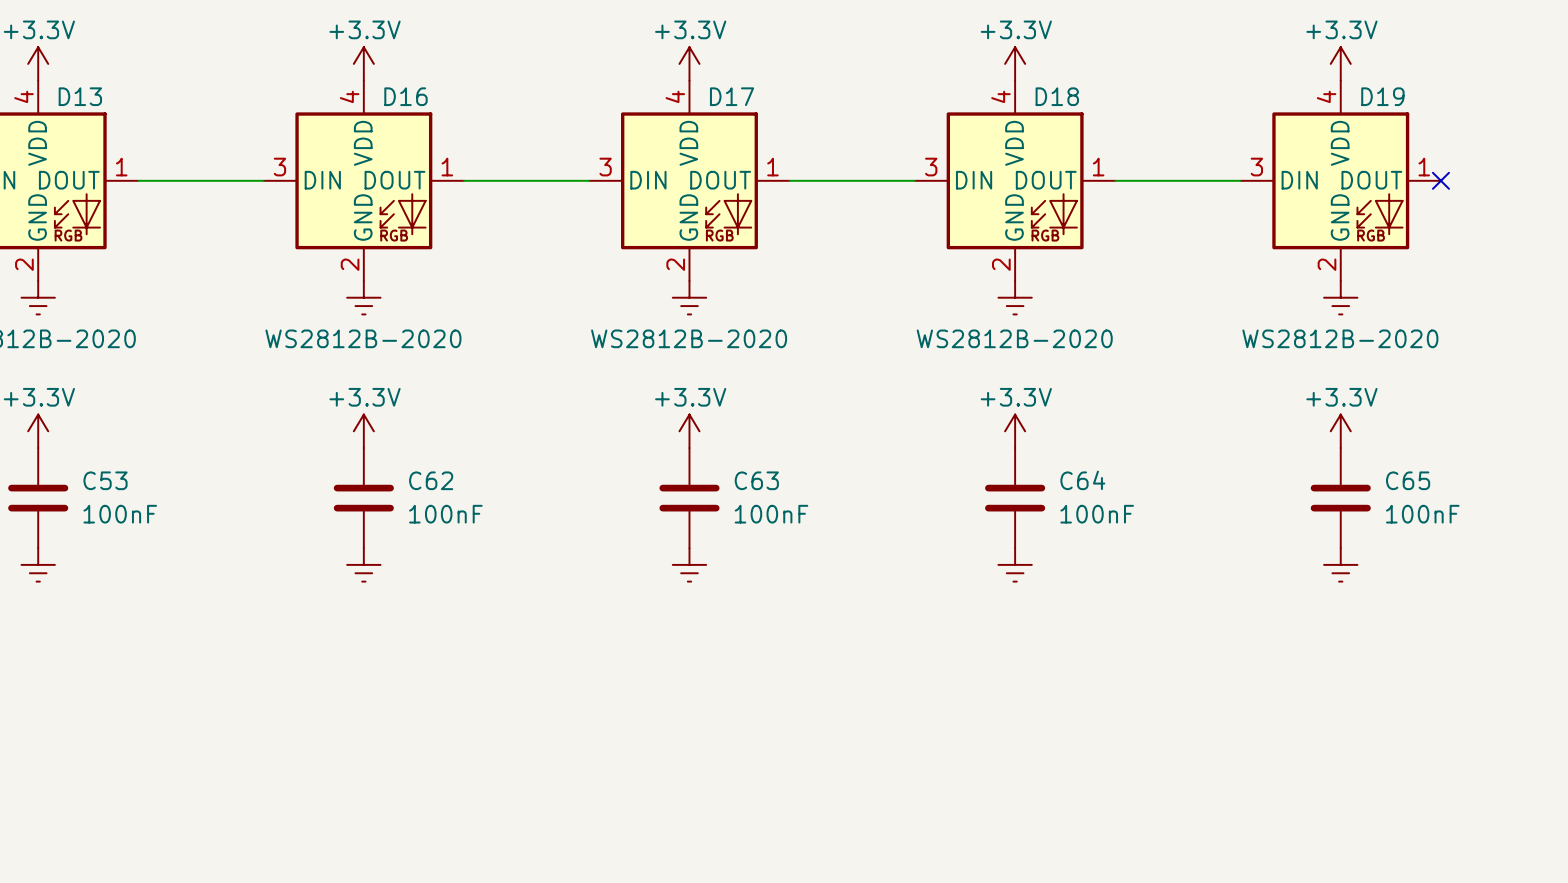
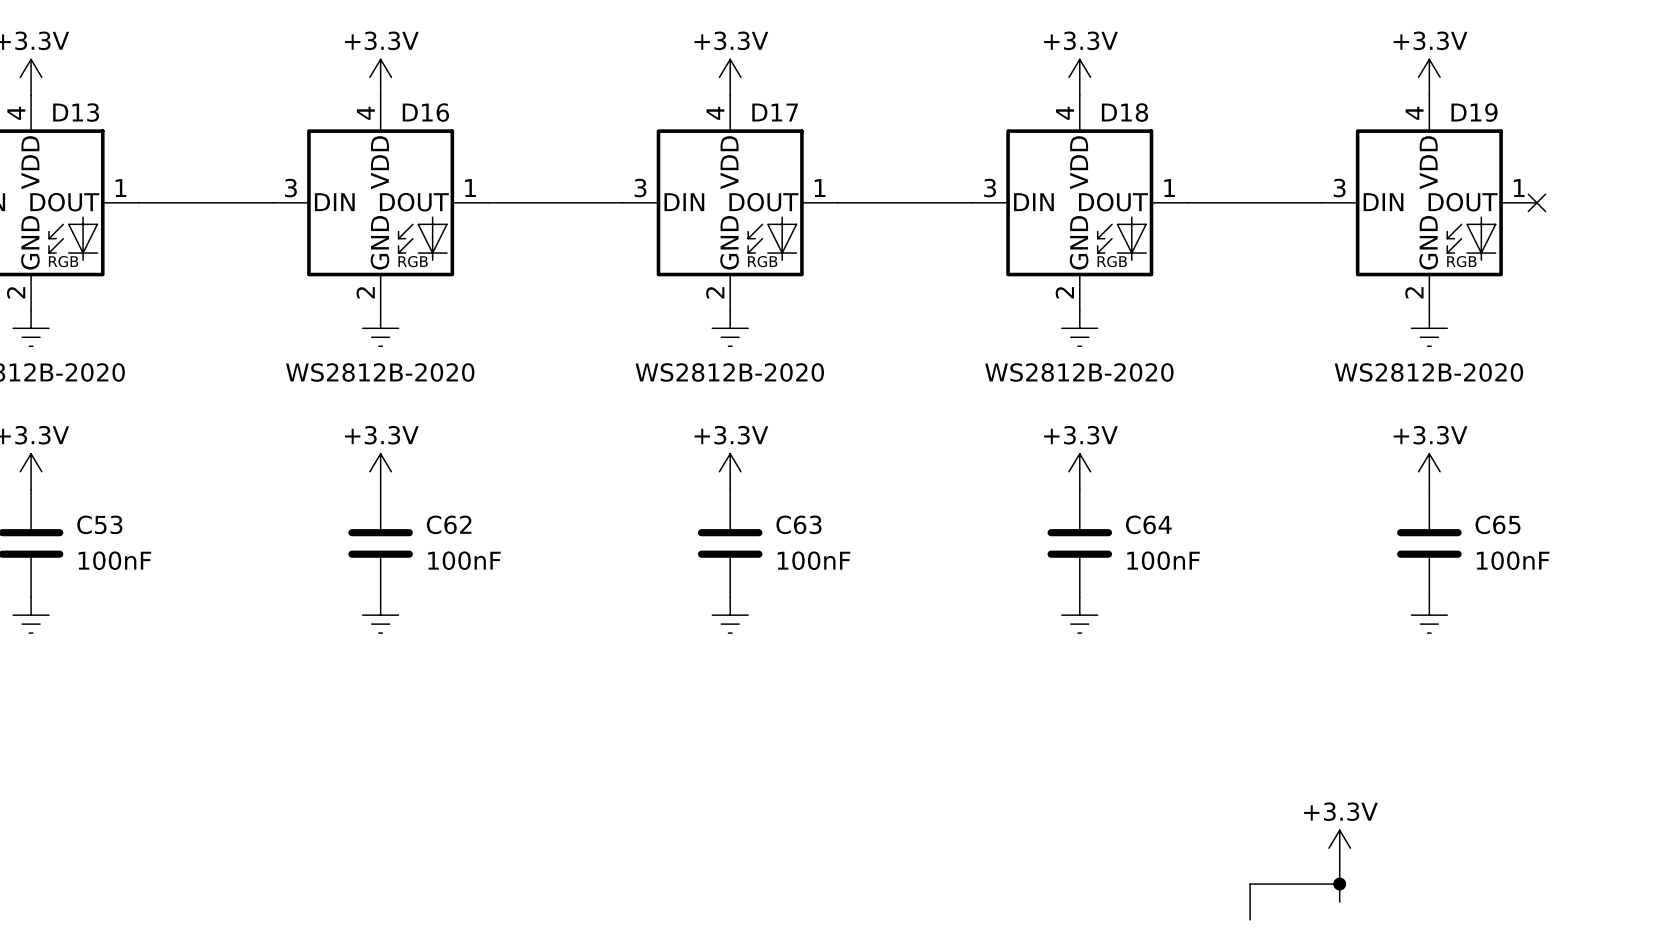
power symbol: none -> +3.3V (1339, 848)
wire: none -> (1339, 866) (1339, 901)
wire: none -> (1339, 884) (1250, 884) (1250, 919)
junction: none -> (1339, 884)

